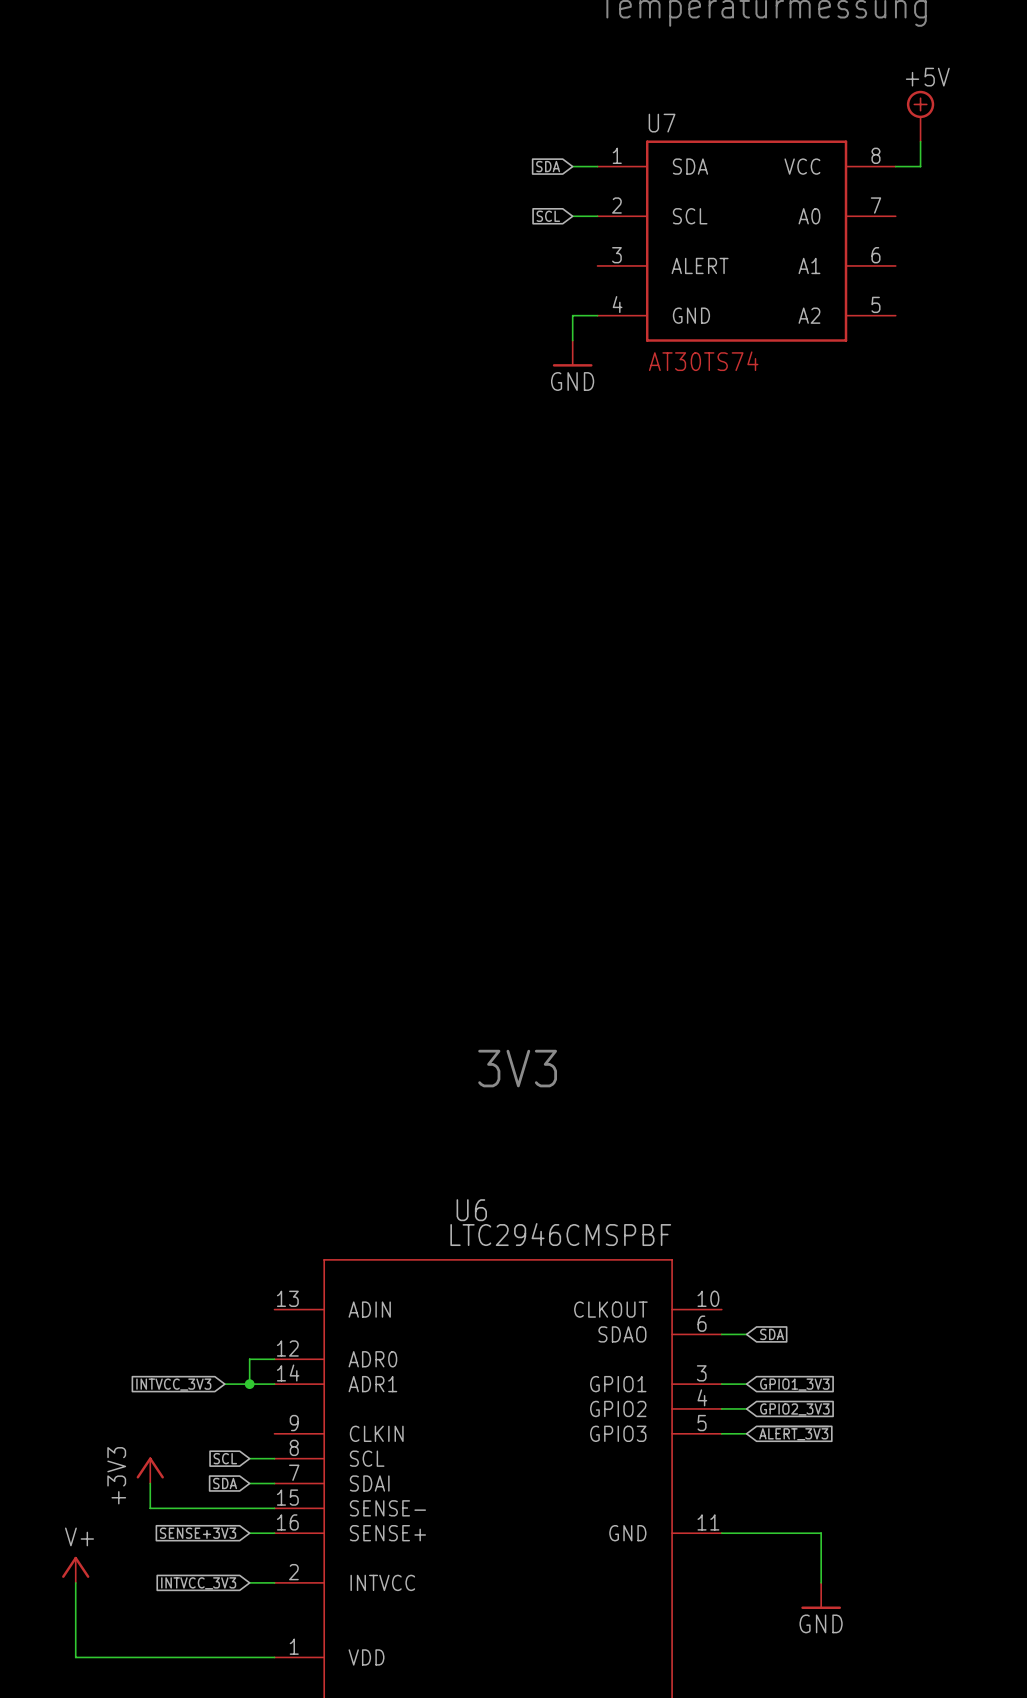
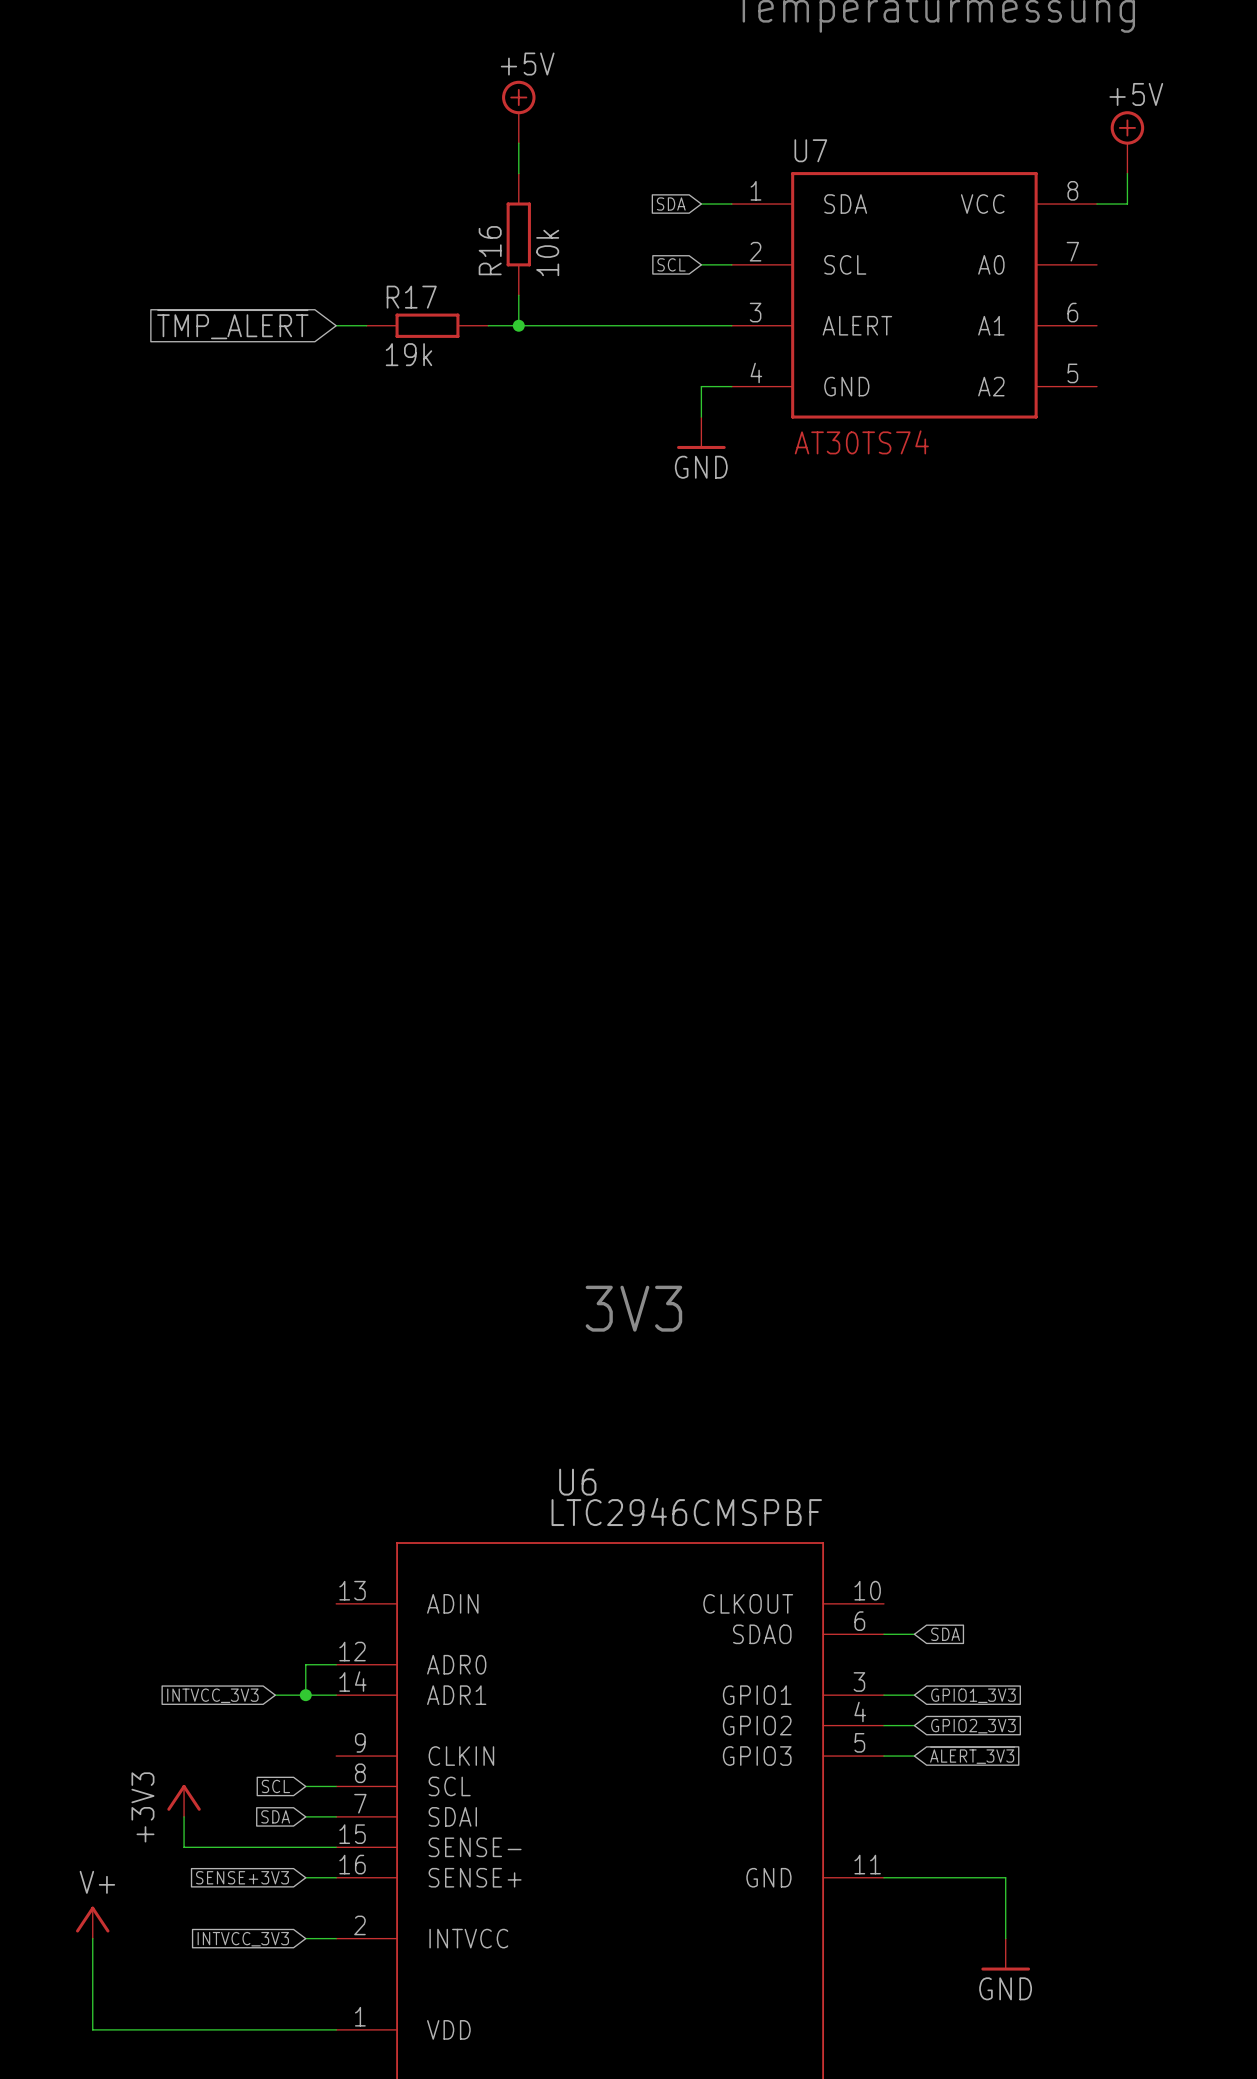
power symbol: none -> +5V (518, 111)
wire: none -> (518, 143) (518, 173)
R16: none -> 10k (518, 234)
wire: none -> (518, 295) (518, 325)
global label: none -> ~{TMP_ALERT} (232, 324)
wire: none -> (336, 325) (366, 325)
R17: none -> 19k (427, 325)
wire: none -> (488, 325) (731, 325)
junction: none -> (518, 325)

